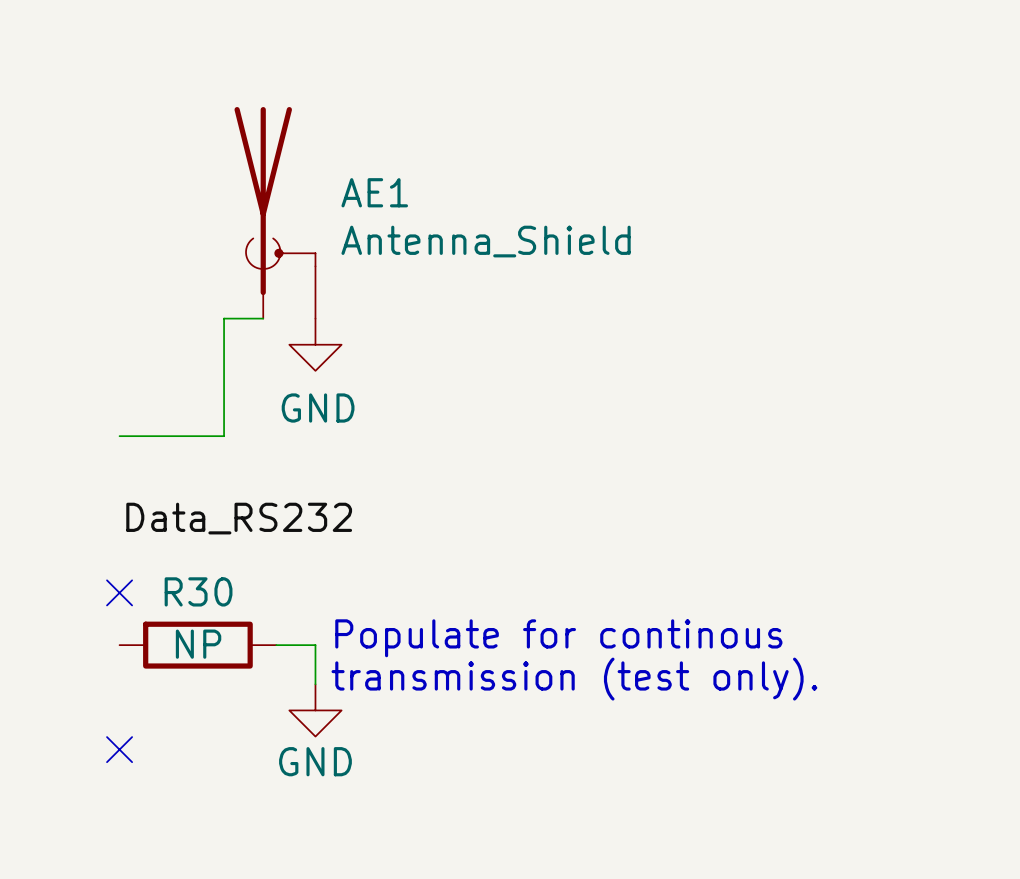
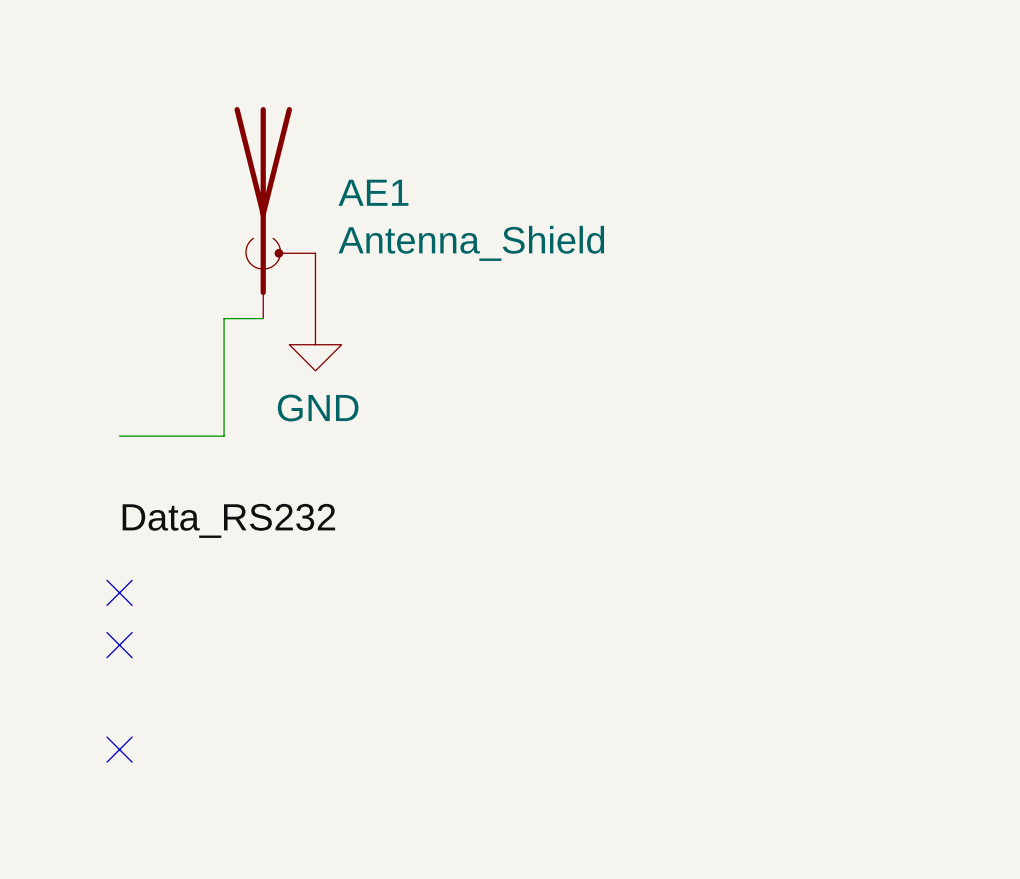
text: Populate for continous (558, 638) -> none
no-connect mark: none -> (119, 645)
R30: NP (197, 645) -> none
wire: (276, 645) (315, 645) (315, 684) -> none
text: transmission (test only). (574, 679) -> none
power symbol: GND (315, 710) -> none

